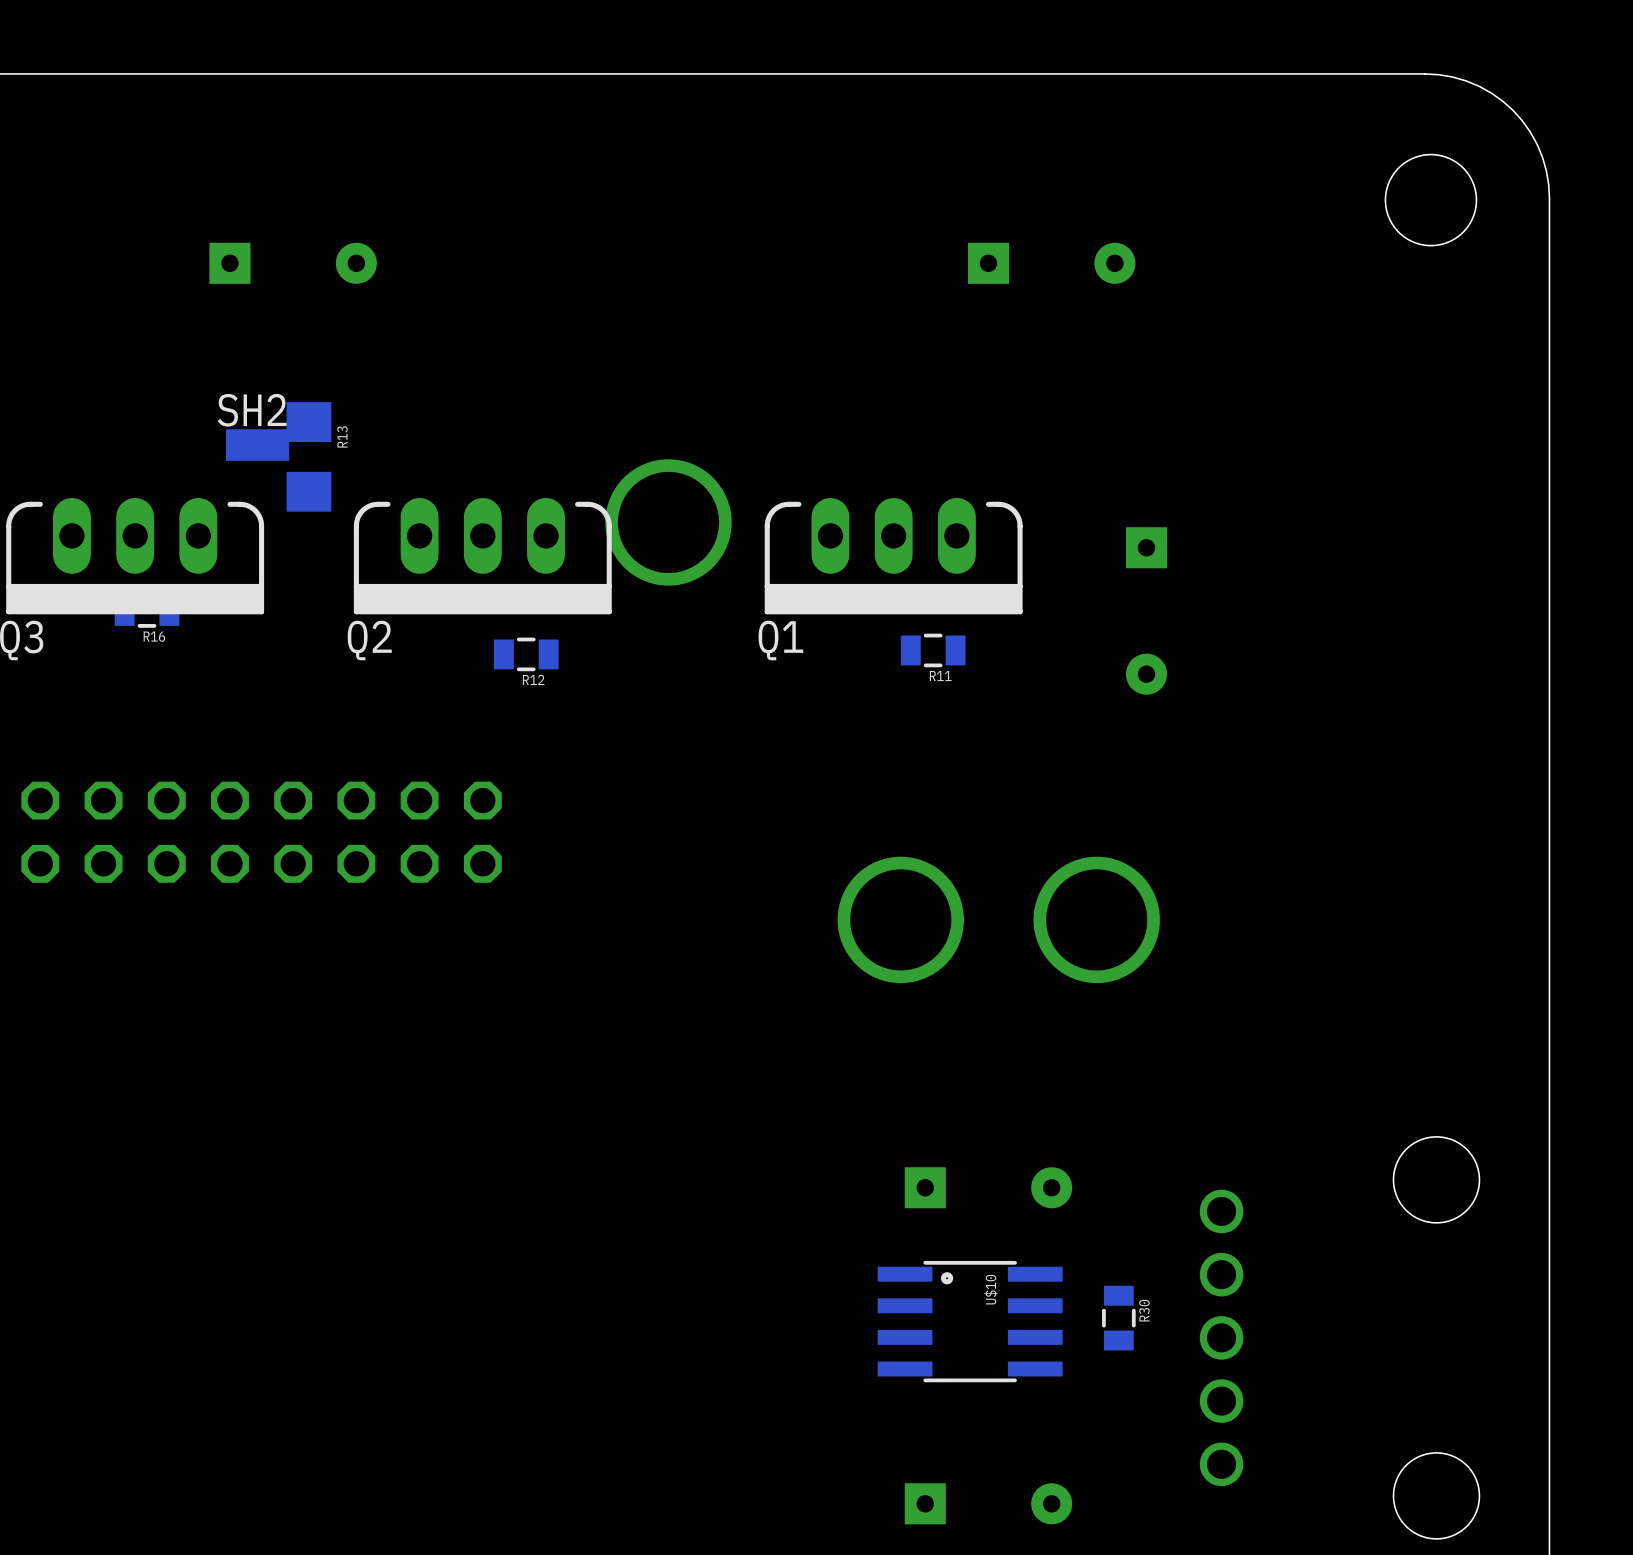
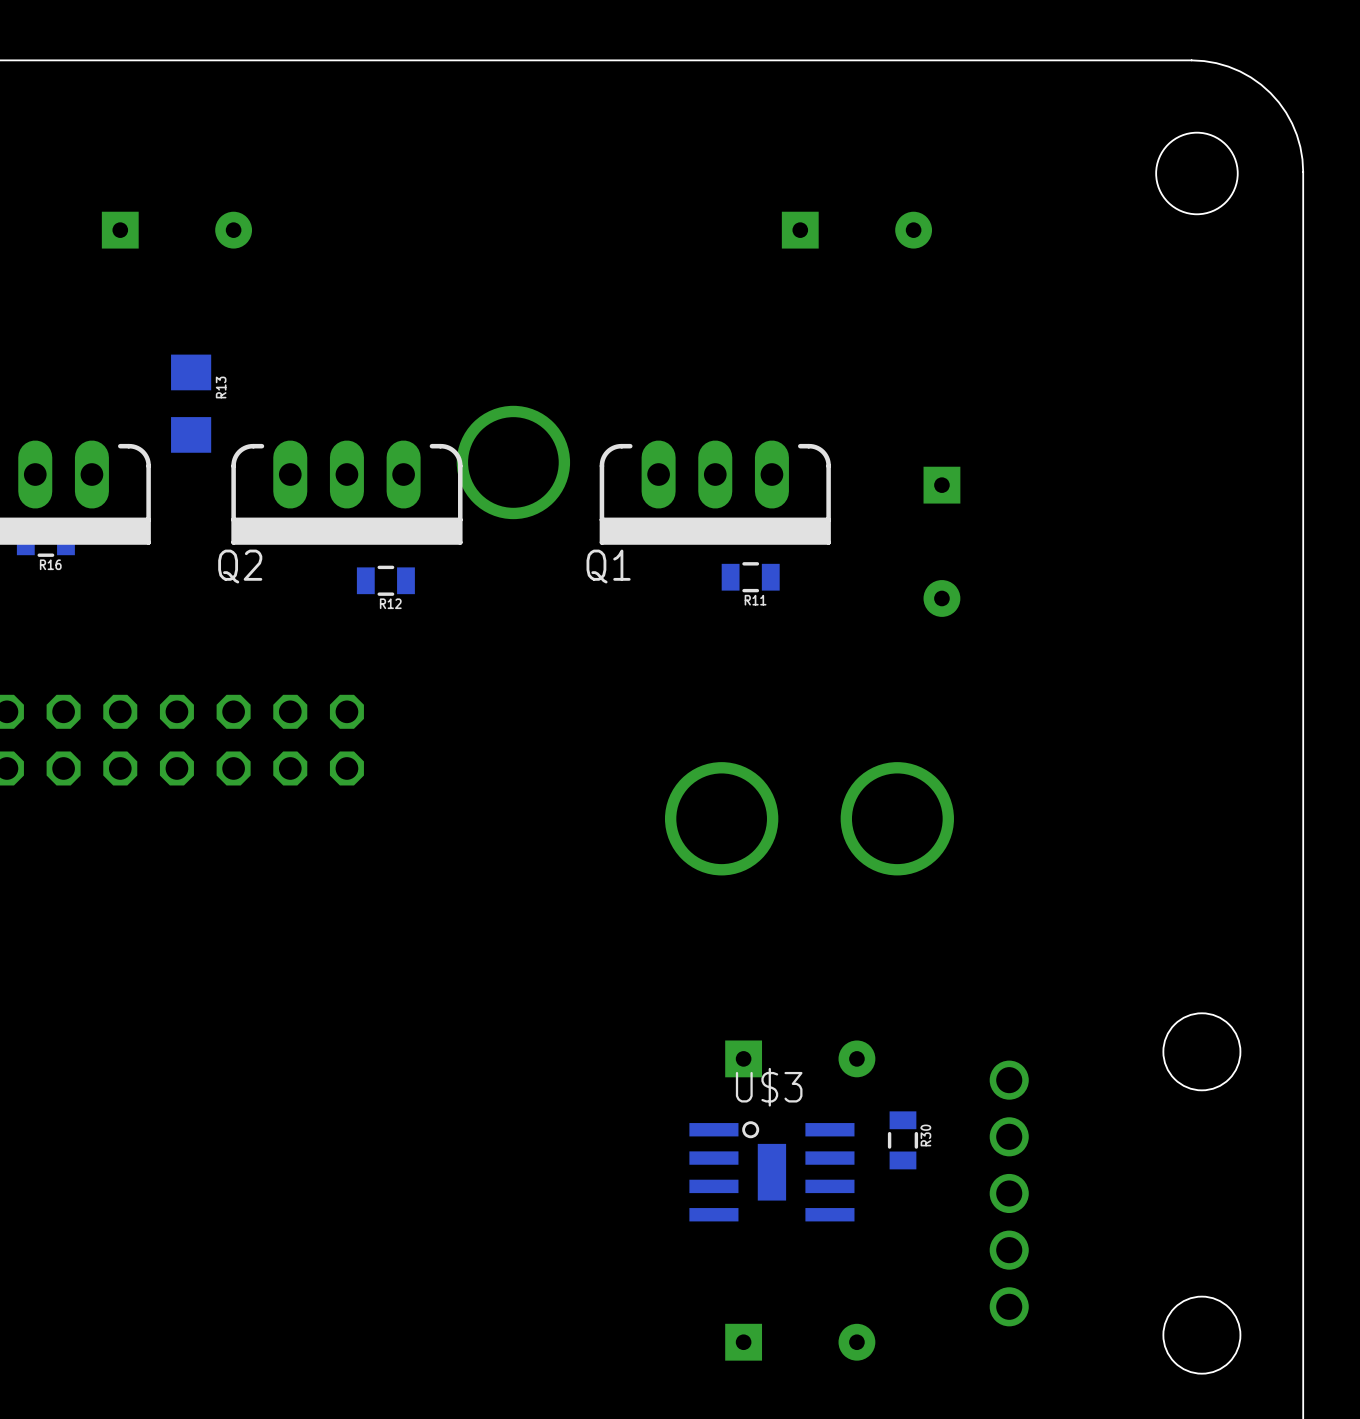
SH2: (257, 445) -> none
U$3: none -> (771, 1171)
R30 position: (1118, 1318) -> (902, 1140)
U$10: (970, 1321) -> none

